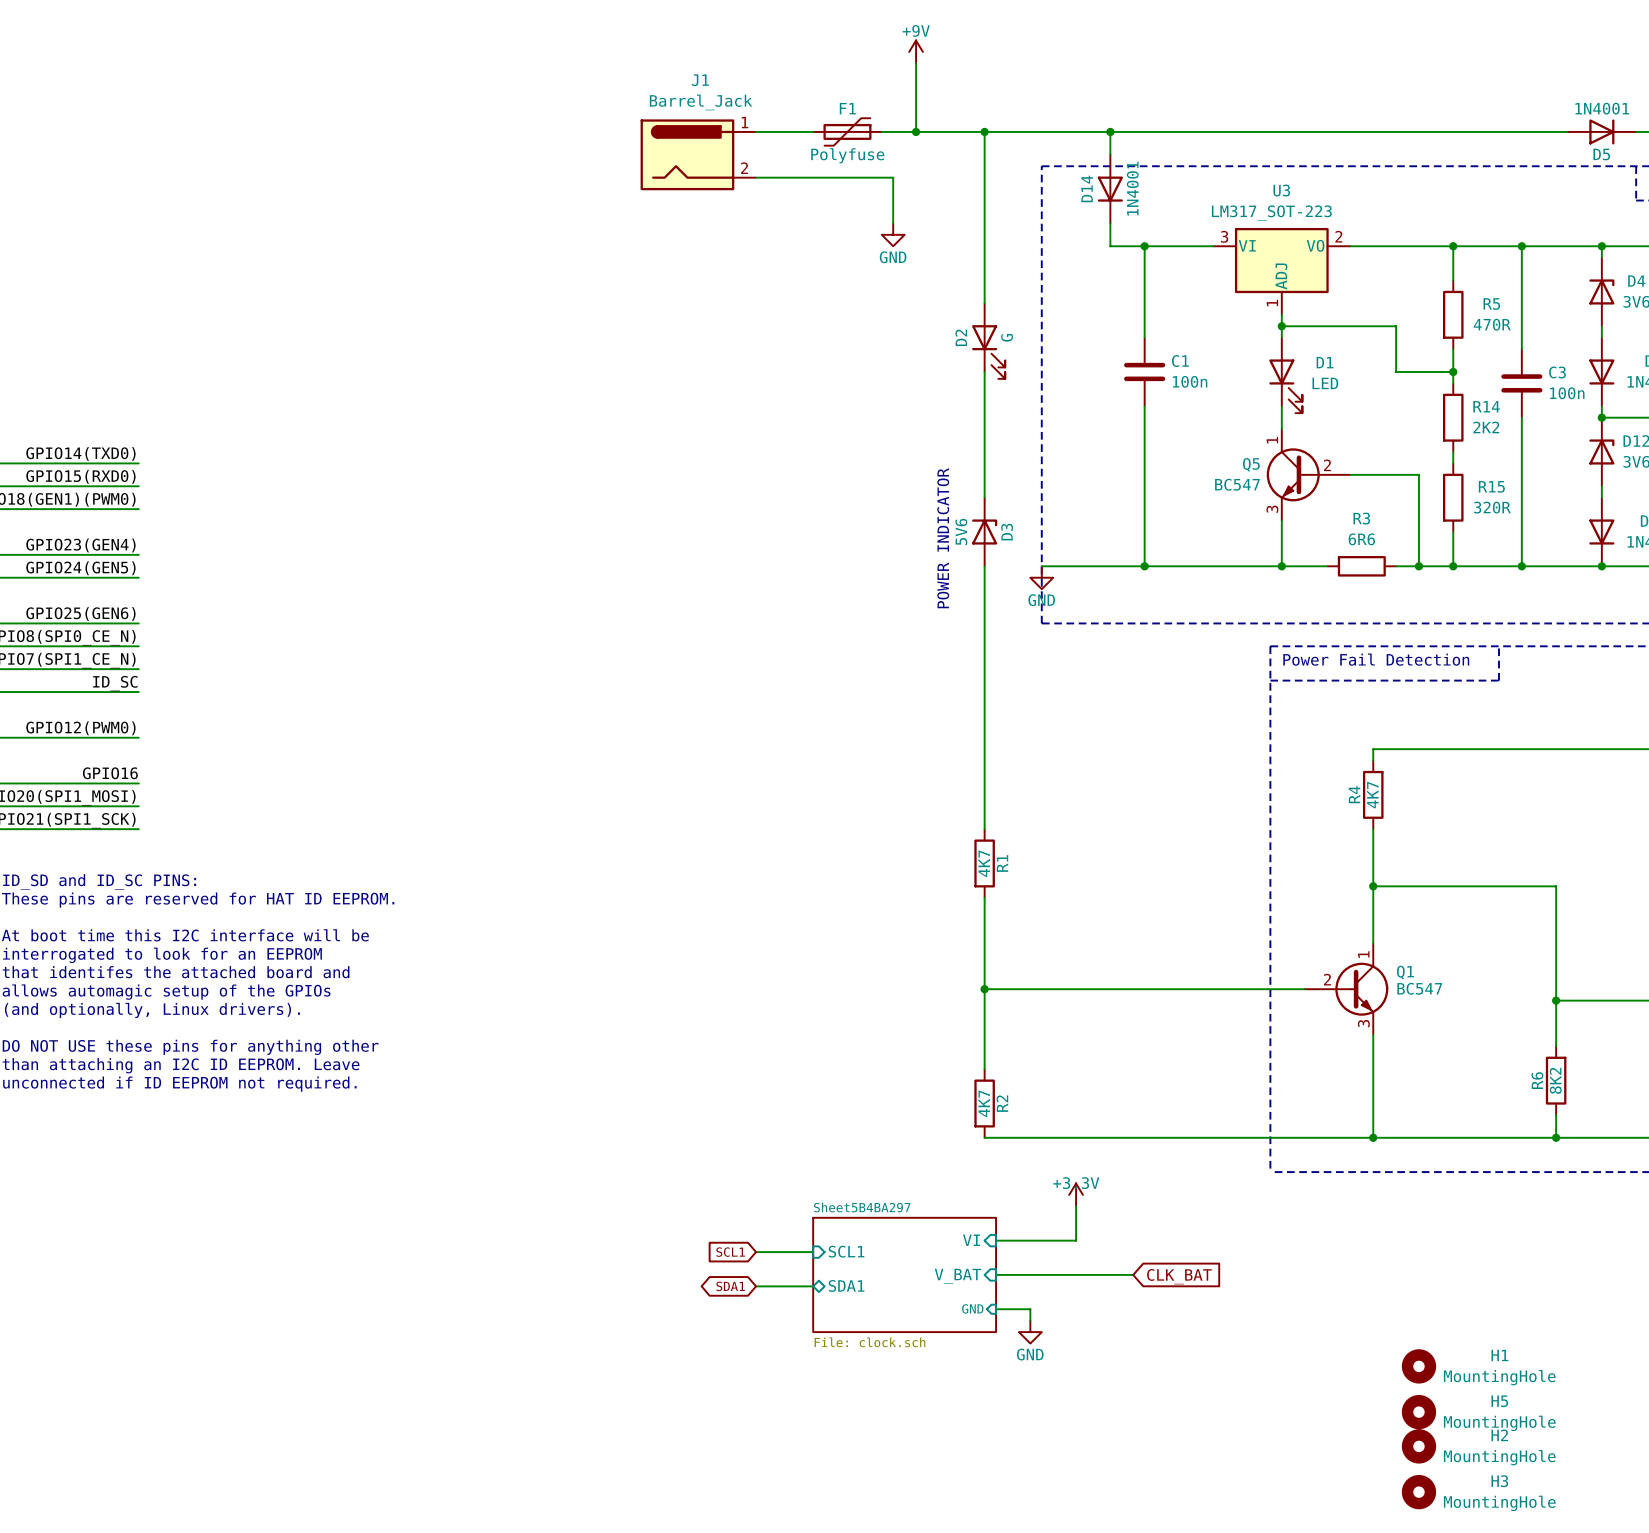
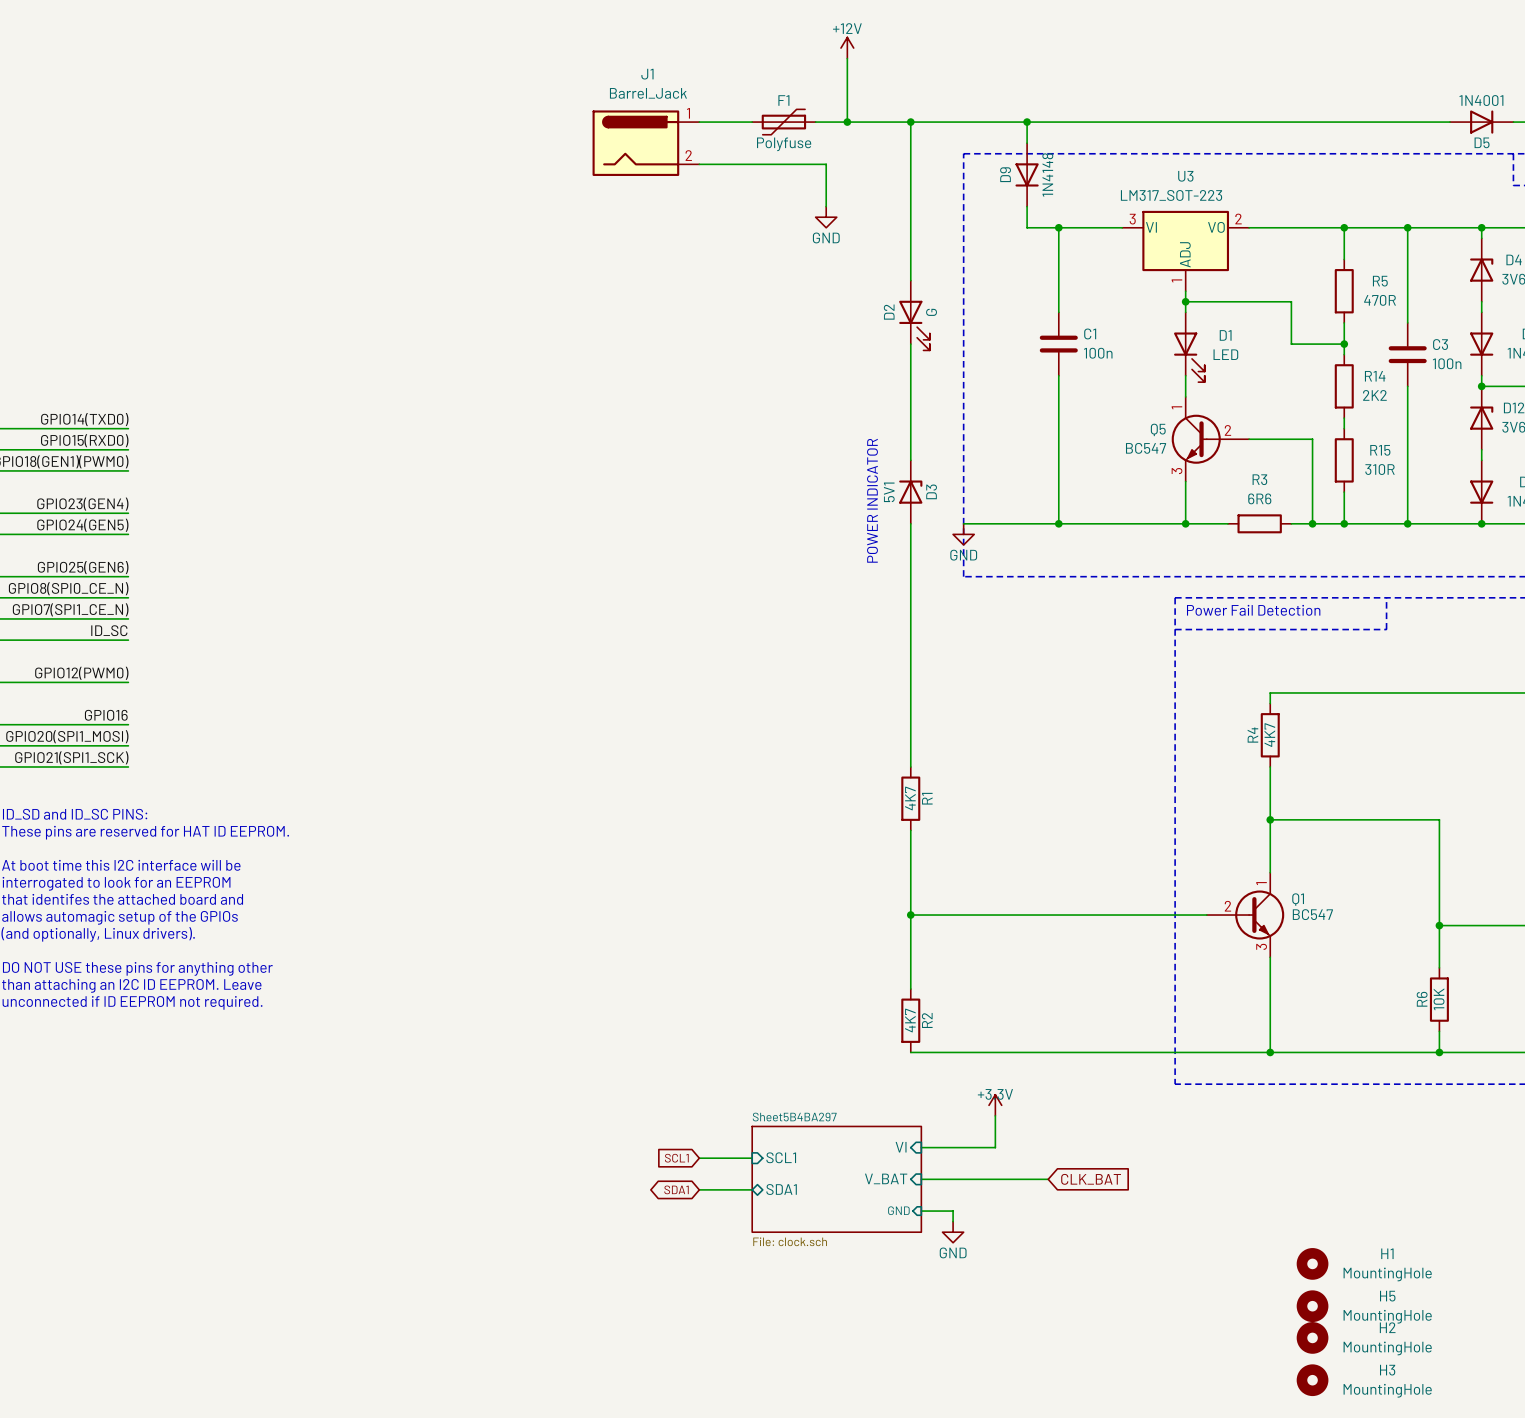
power symbol: +9V (916, 51) -> +12V (847, 48)
D14 name: D14 (1087, 188) -> D9 (1005, 174)
D14 value: 1N4001 (1132, 188) -> 1N4148 (1047, 174)
R15 value: 320R (1492, 507) -> 310R (1380, 469)
D3 value: 5V6 (961, 531) -> 5V1 (889, 492)
R6 value: 8K2 (1555, 1080) -> 10K (1439, 999)

